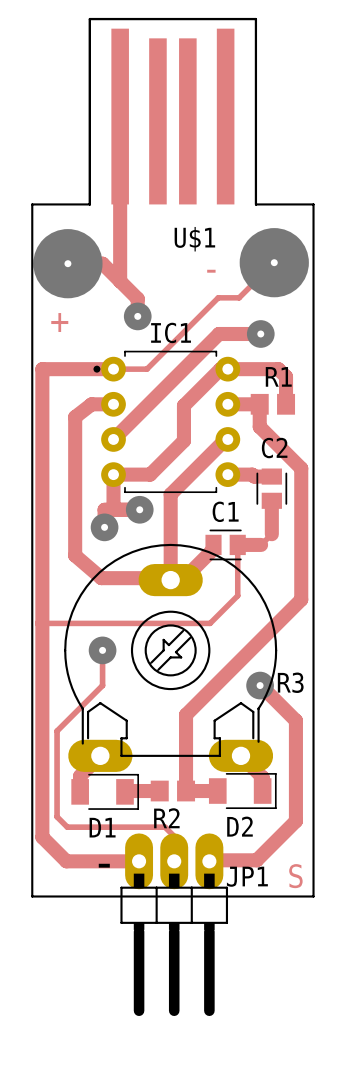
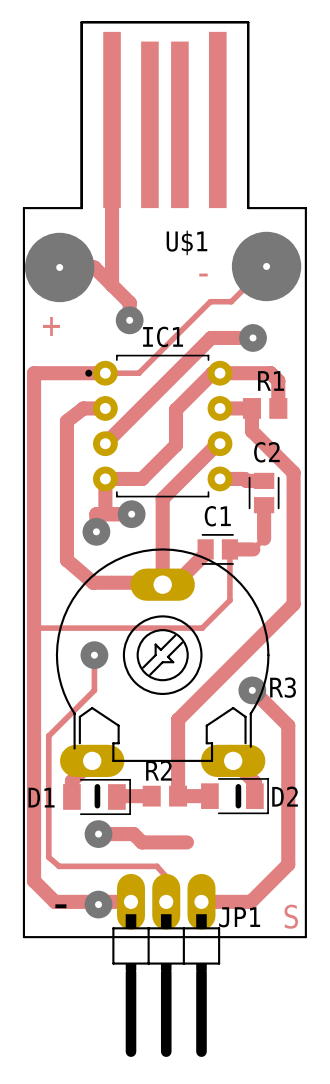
line: none -> (97, 786) (97, 805)
line: none -> (238, 786) (238, 805)
track: (57, 816) (67, 827) (165, 827) (174, 836) (174, 861) -> (48, 822) (48, 857) (59, 866) (157, 866) (166, 876) (166, 901)
R2 name position: R2 (166, 818) -> R2 (158, 770)
track: (295, 821) (256, 860) (209, 861) -> (288, 826) (288, 864) (250, 901) (201, 901)
D2 name position: D2 (239, 826) -> D2 (285, 796)
D1 name position: D1 (102, 827) -> D1 (41, 797)
track: none -> (98, 834) (133, 834) (142, 842) (186, 842)
via: none -> (98, 834)
track: (42, 837) (66, 861) (139, 861) -> (34, 842) (34, 881) (54, 901) (131, 901)
text position: - (104, 865) -> - (60, 906)
text position: S (295, 876) -> S (291, 916)
board edge: (32, 896) (313, 896) -> (23, 901) (23, 937) (305, 937) (305, 901)
via: none -> (98, 904)
JP1 position: (174, 924) -> (166, 965)

